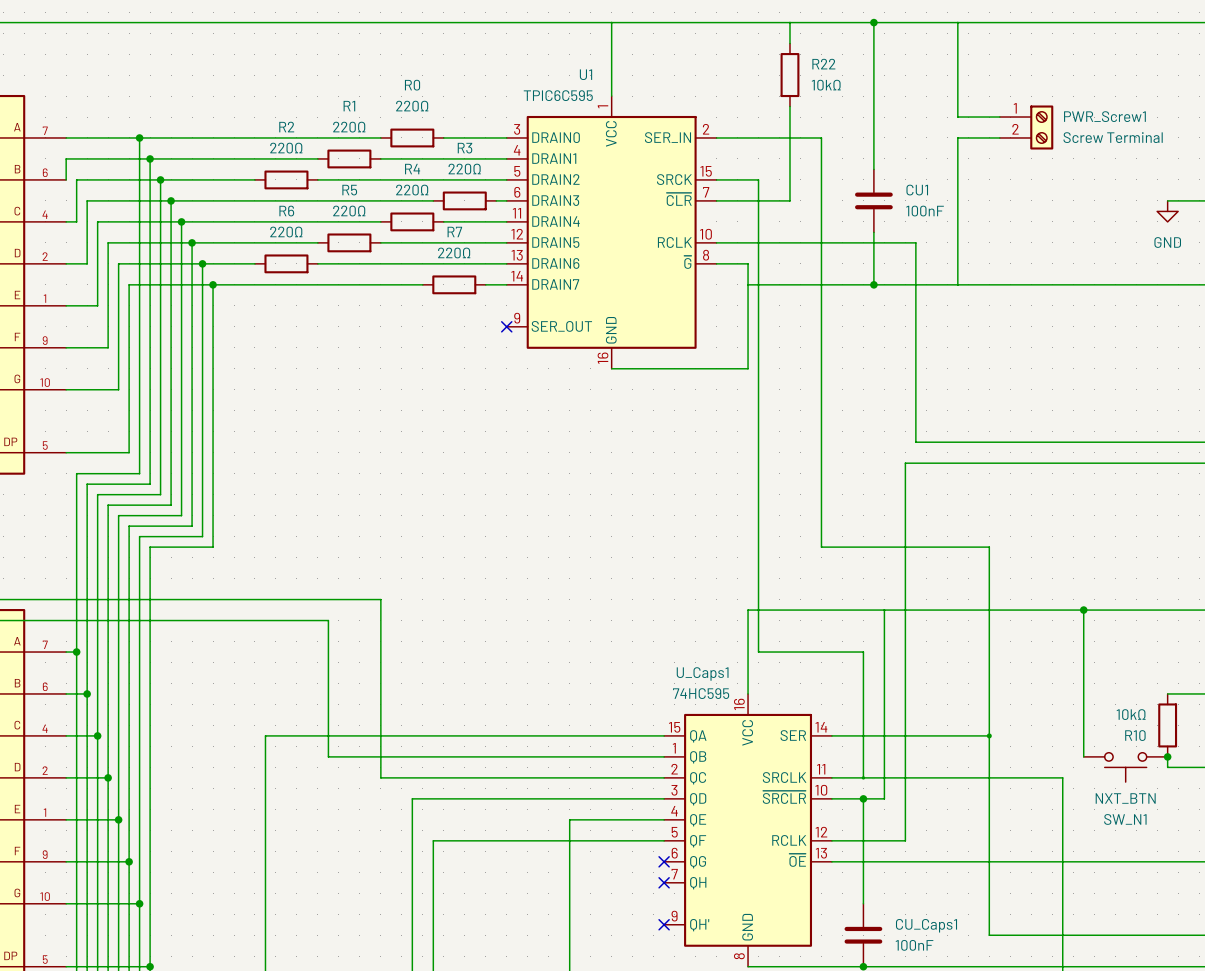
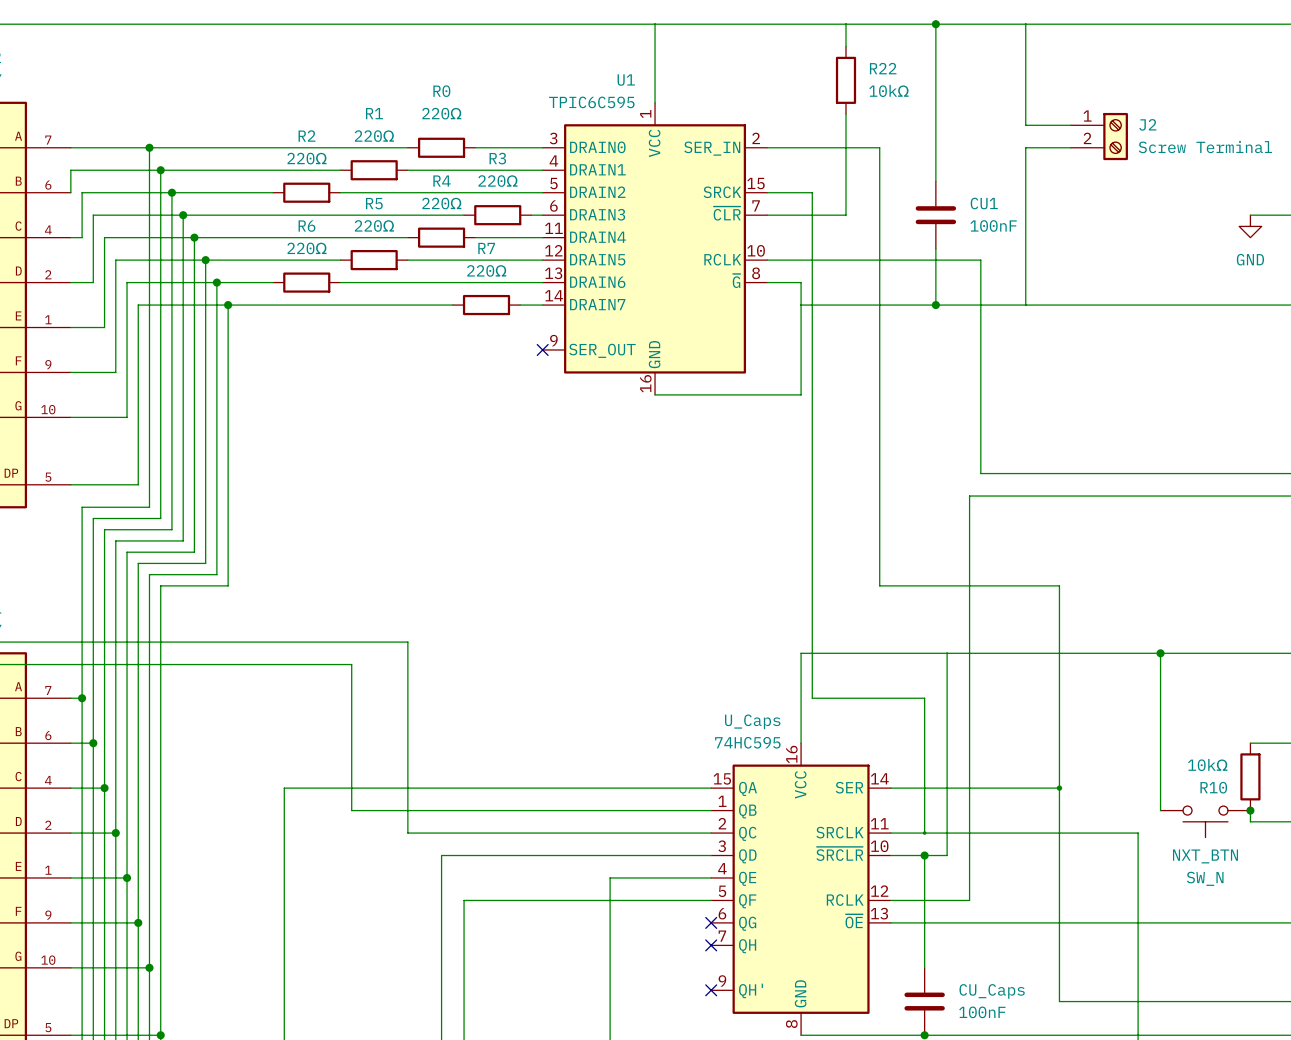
PWR_Screw1 name: PWR_Screw1 (1104, 116) -> J2 (1147, 124)
U_Caps1 name: U_Caps1 (702, 673) -> U_Caps (752, 721)
SW_N1 name: SW_N1 (1125, 819) -> SW_N (1205, 878)
CU_Caps1 name: CU_Caps1 (926, 925) -> CU_Caps (992, 991)

